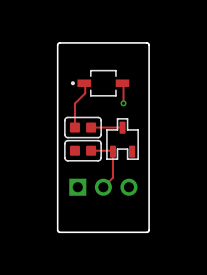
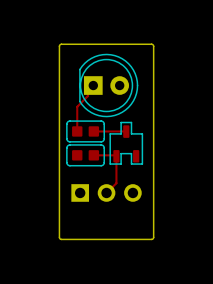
part footprint: [70, 70, 130, 97] -> [79, 53, 139, 118]
track: (123, 83) (123, 103) -> none
via: (123, 103) -> none

